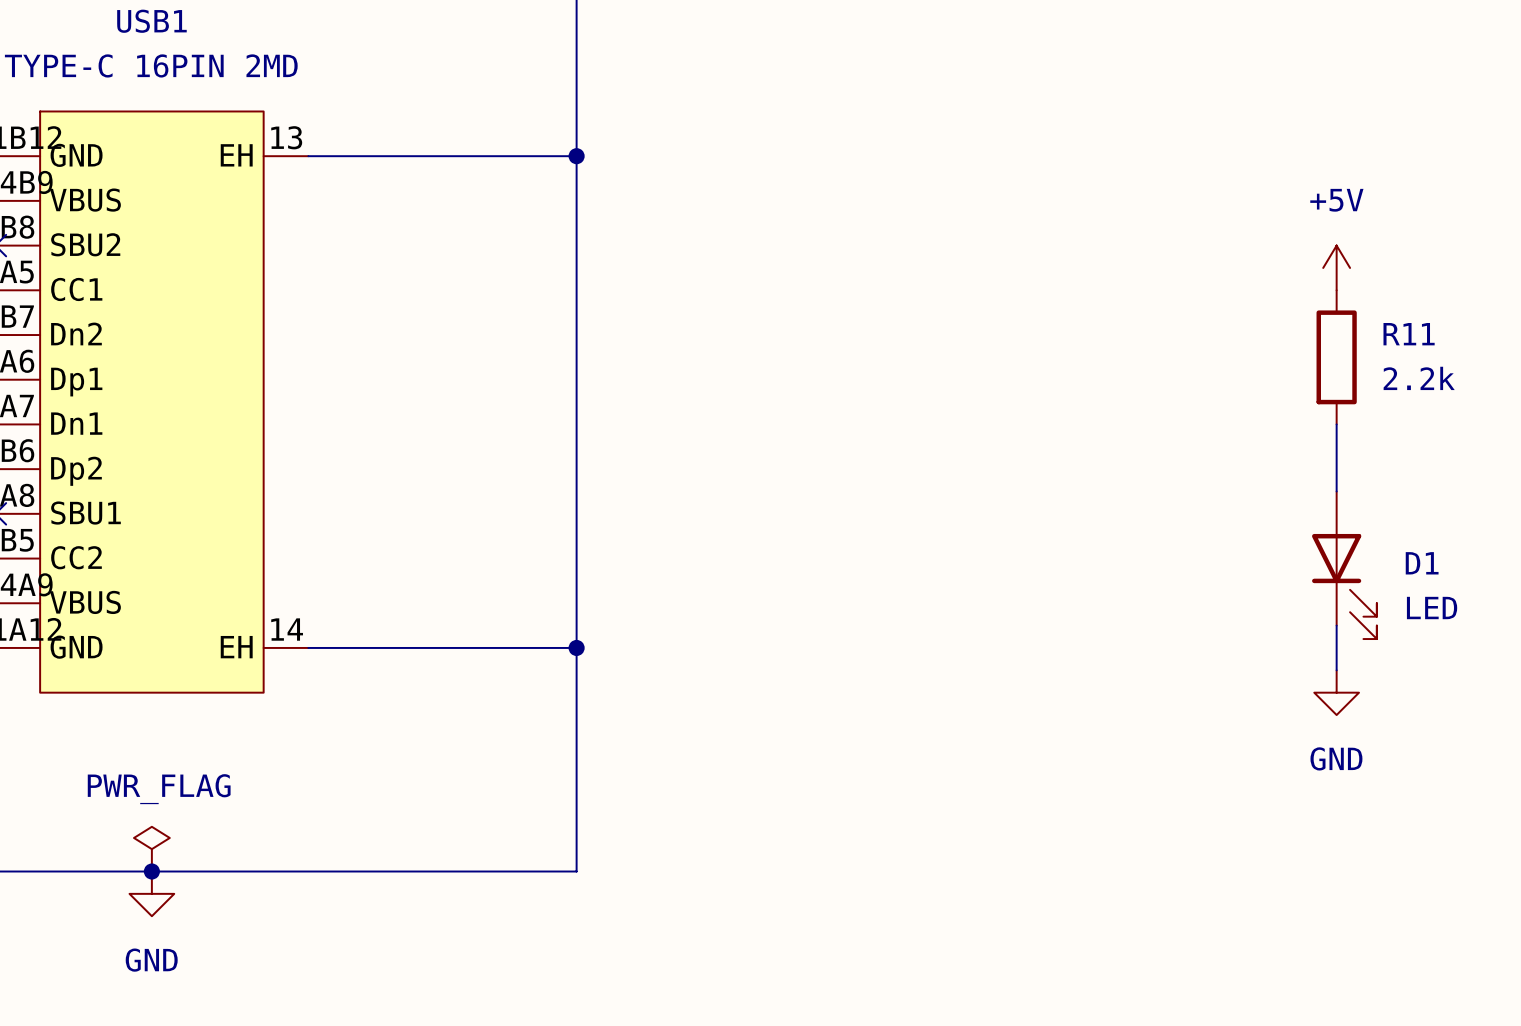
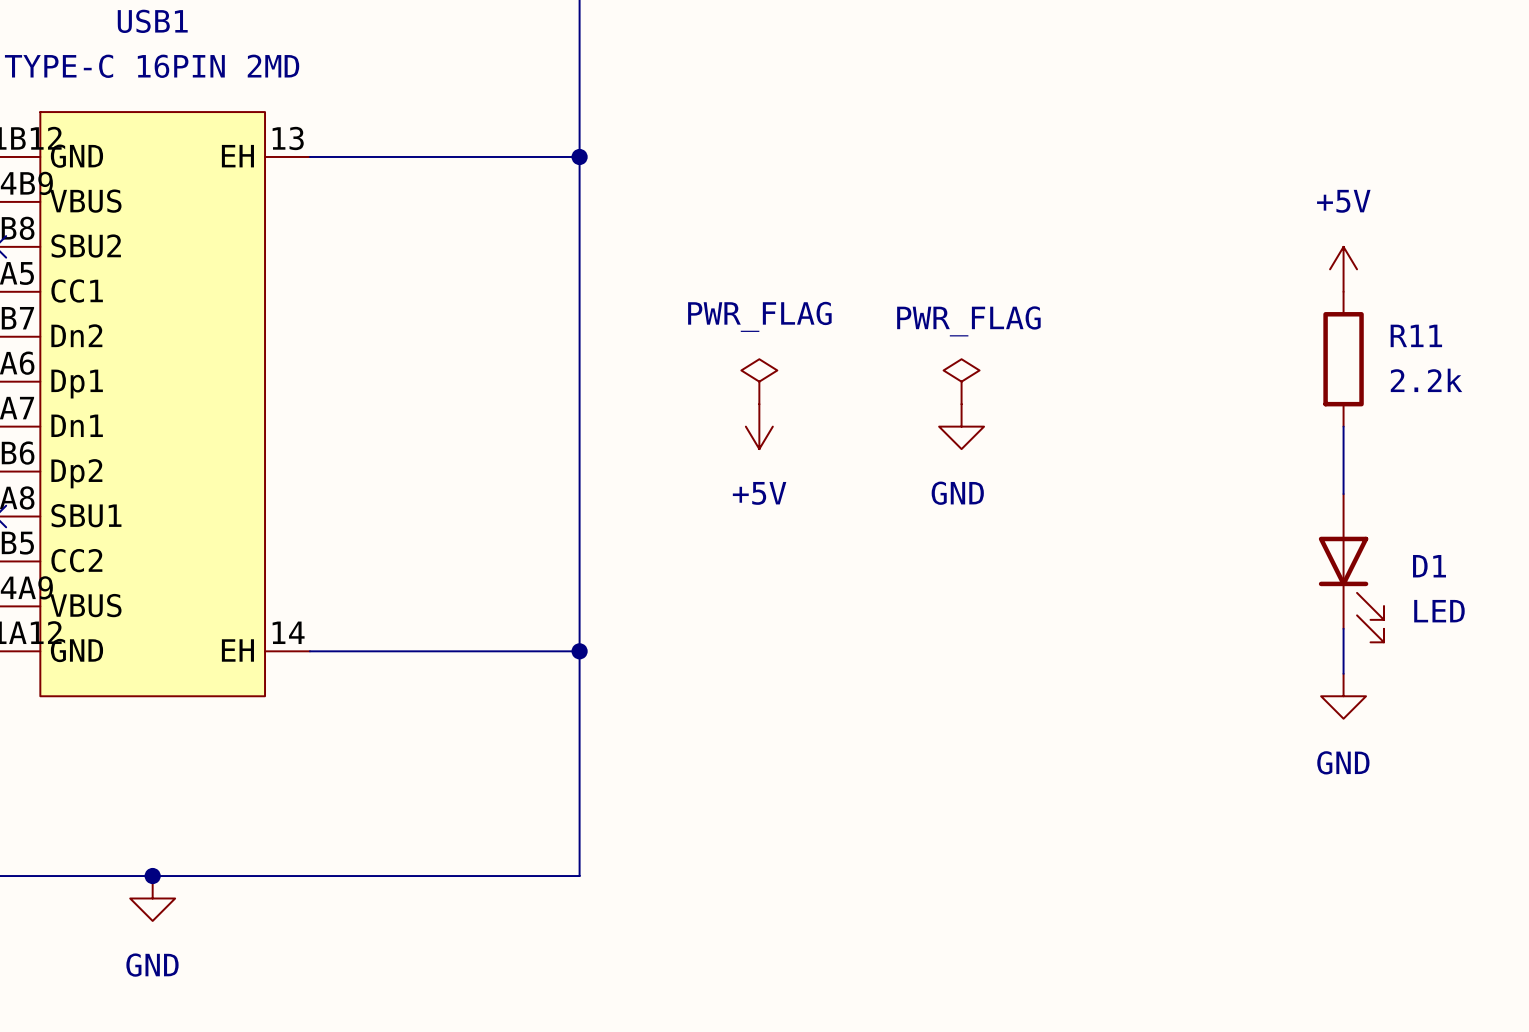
power symbol: none -> PWR_FLAG (759, 381)
power symbol: none -> PWR_FLAG (961, 381)
power symbol: none -> +5V (759, 426)
power symbol: none -> GND (961, 426)
power symbol: PWR_FLAG (151, 849) -> none

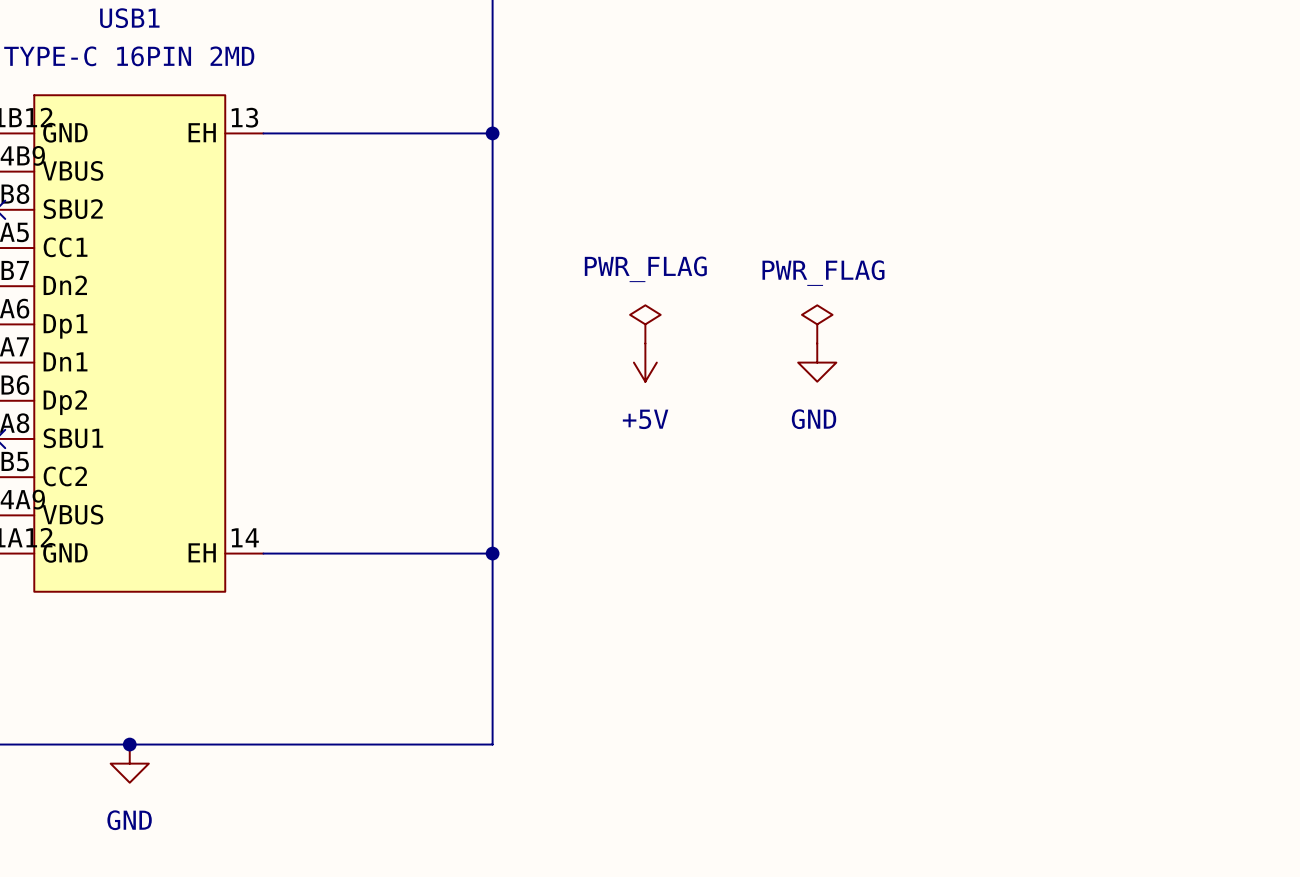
power symbol: +5V (1343, 269) -> none
R11: 2.2k (1343, 359) -> none
wire: (1343, 426) (1343, 494) -> none
D1: LED (1351, 568) -> none
wire: (1343, 628) (1343, 673) -> none
power symbol: GND (1343, 696) -> none

